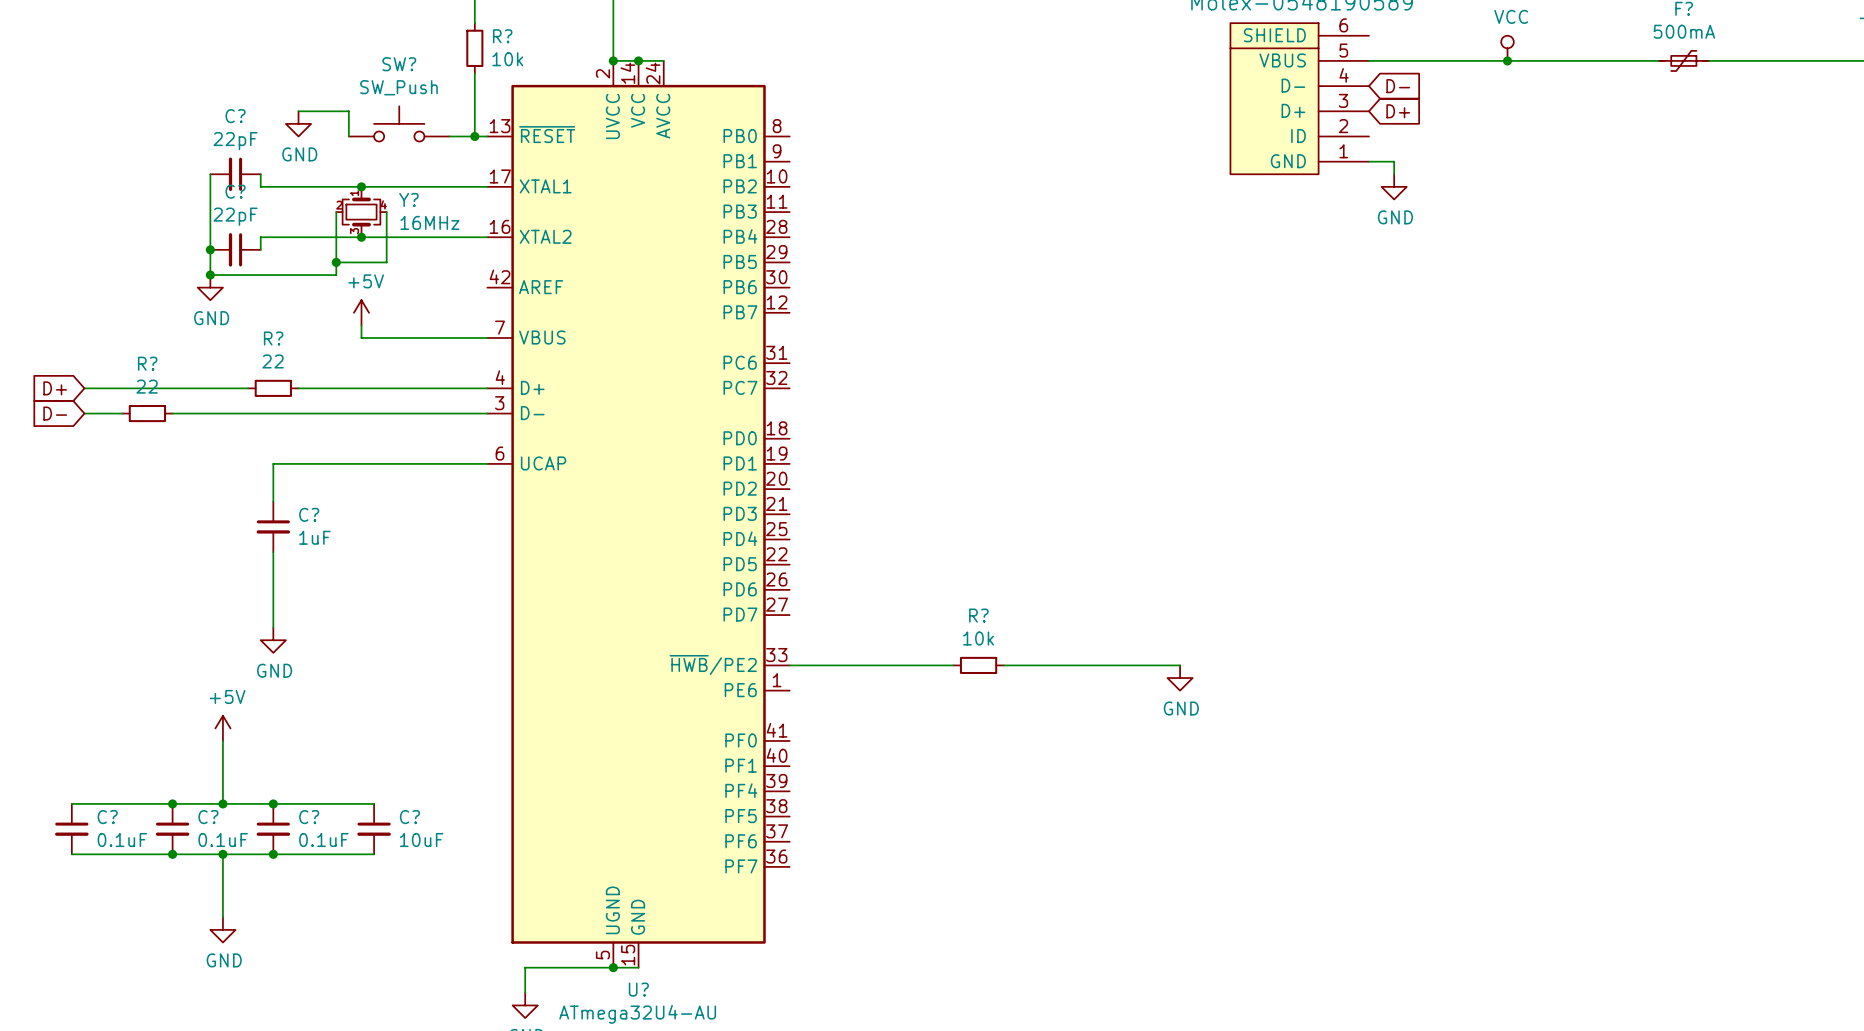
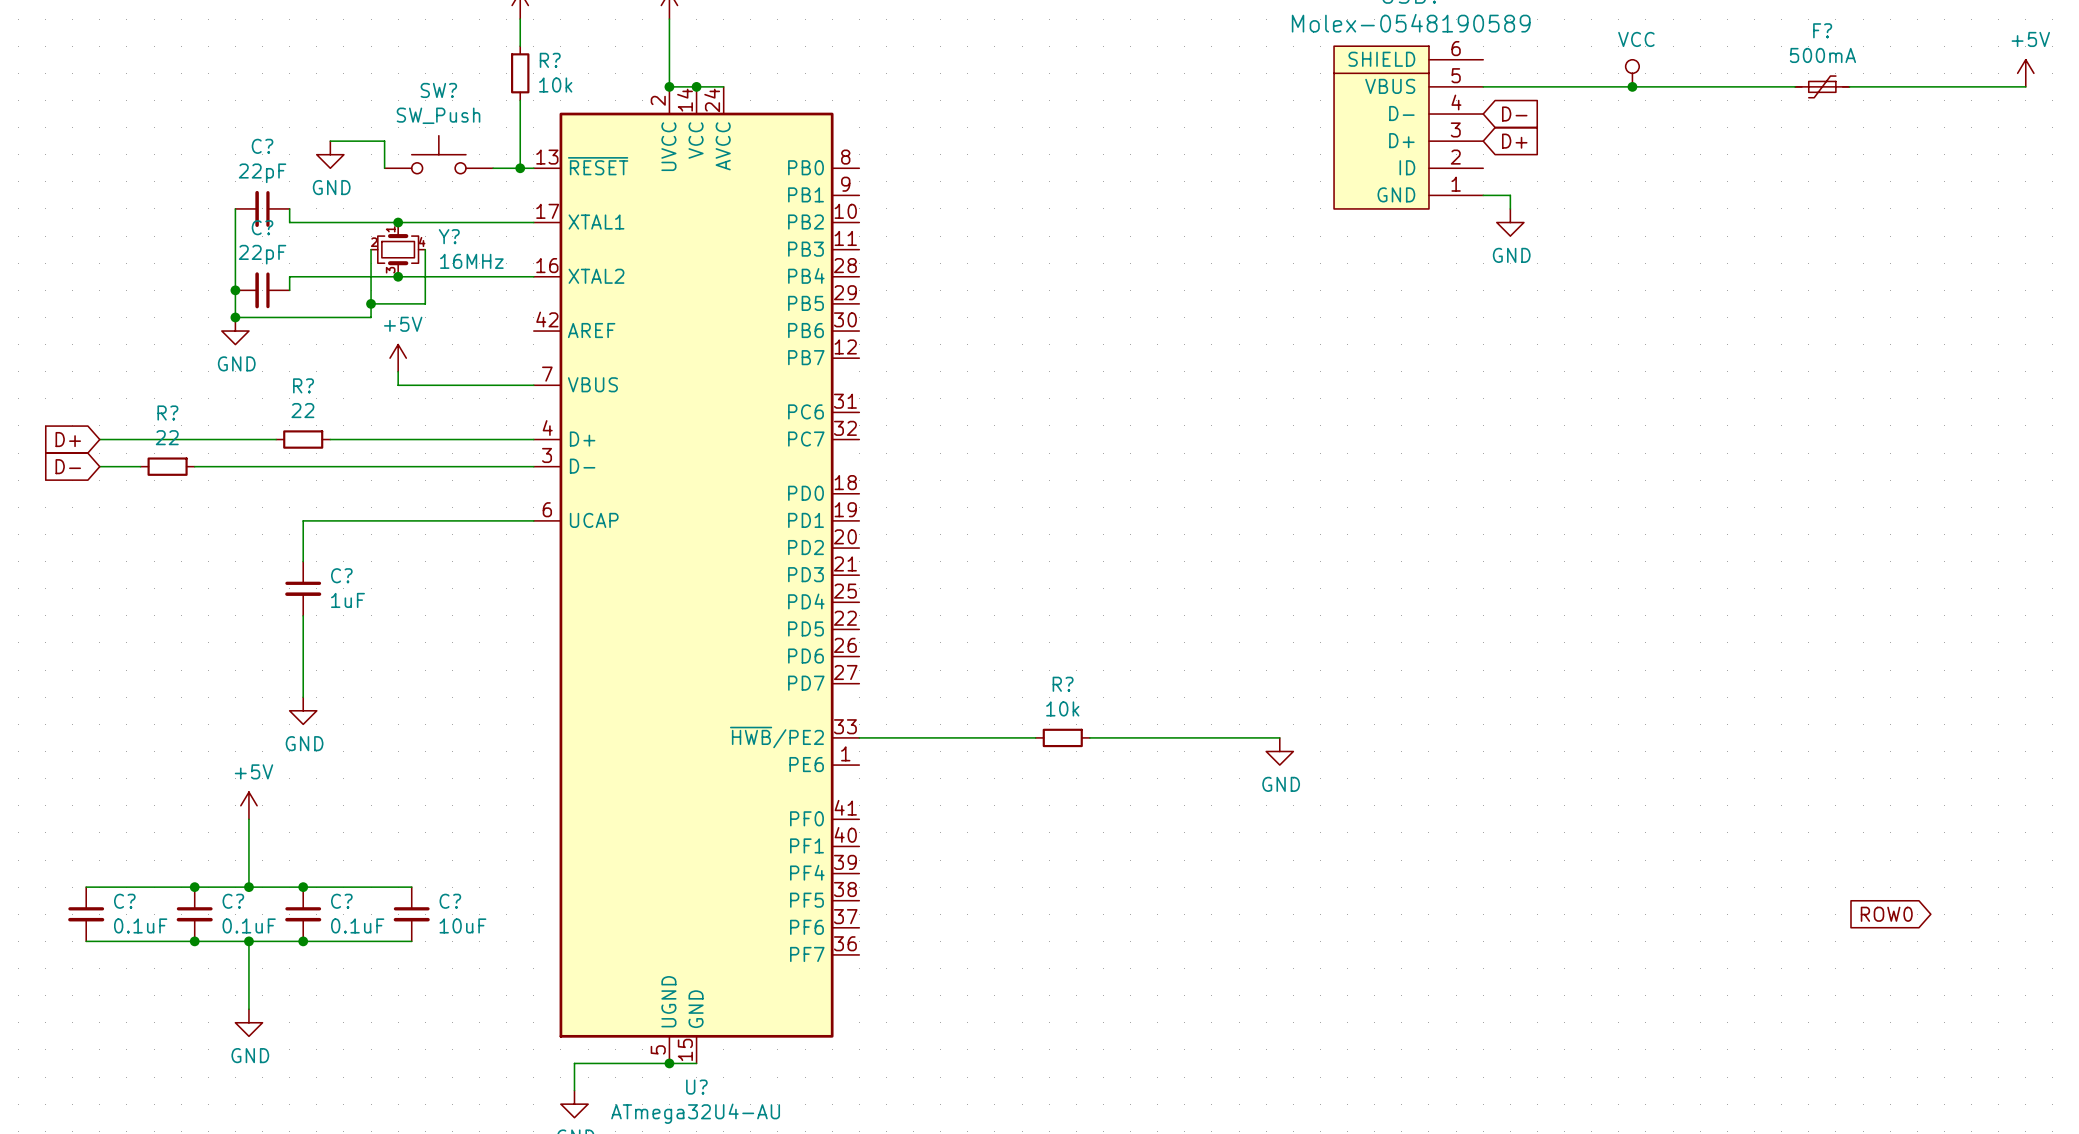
global label: none -> ROW0 (1886, 914)

